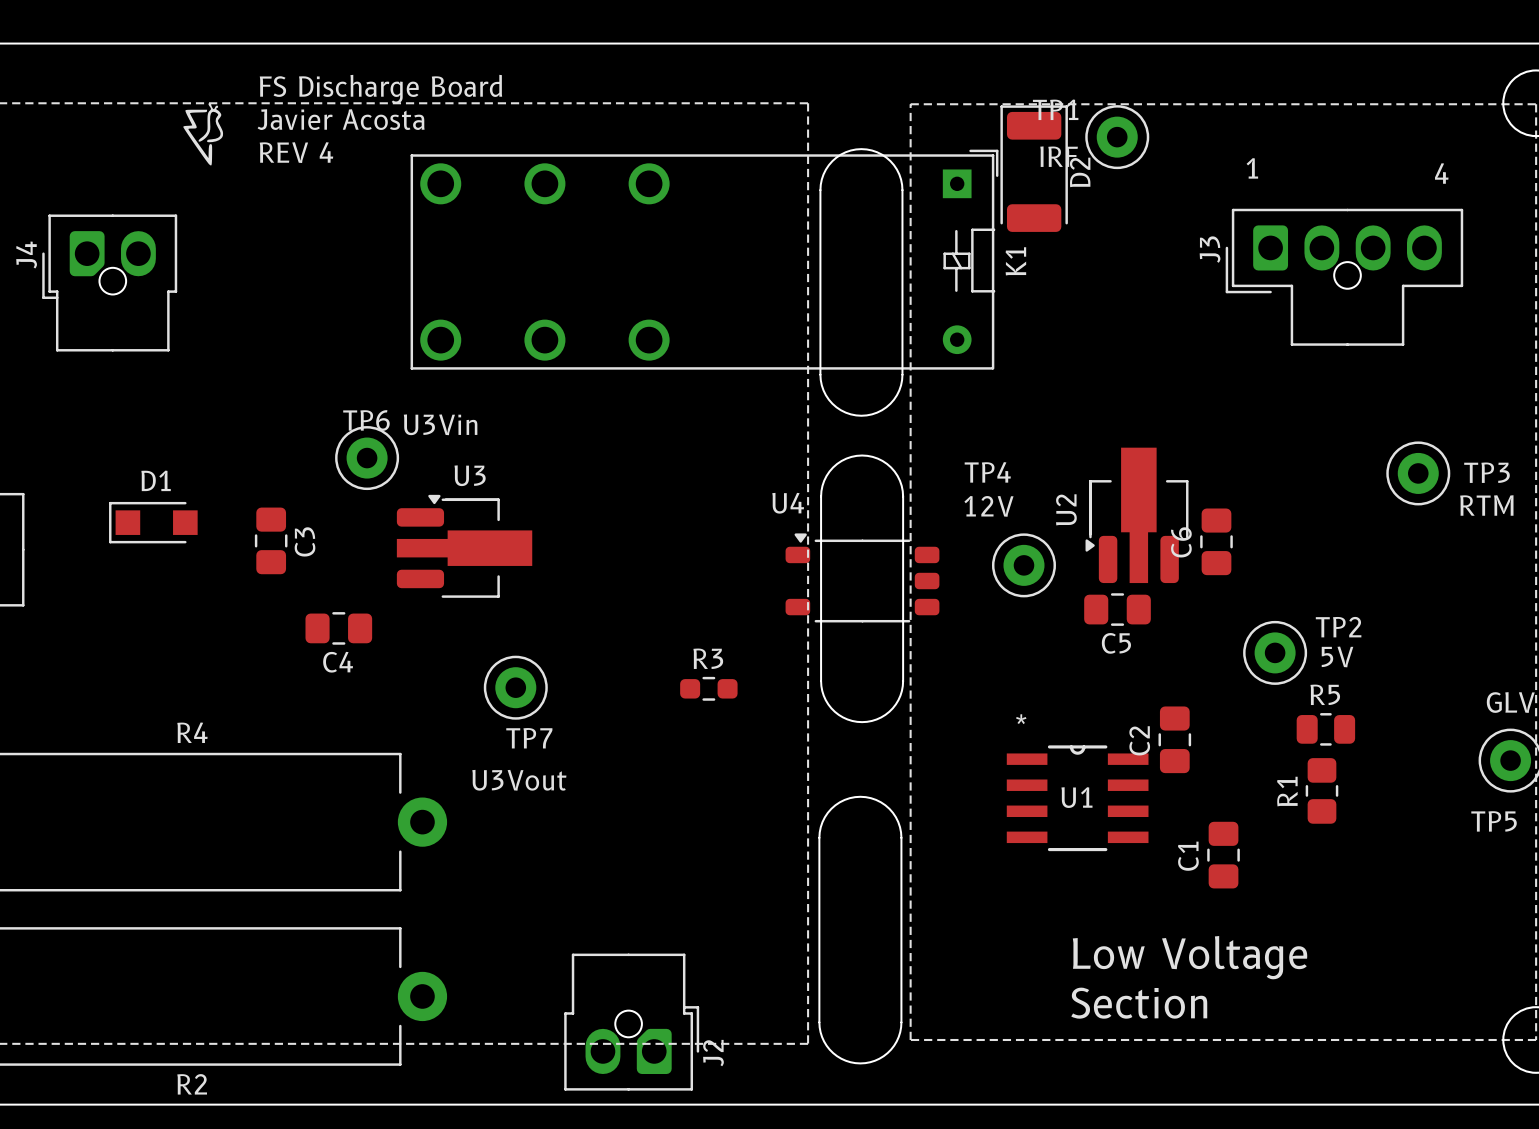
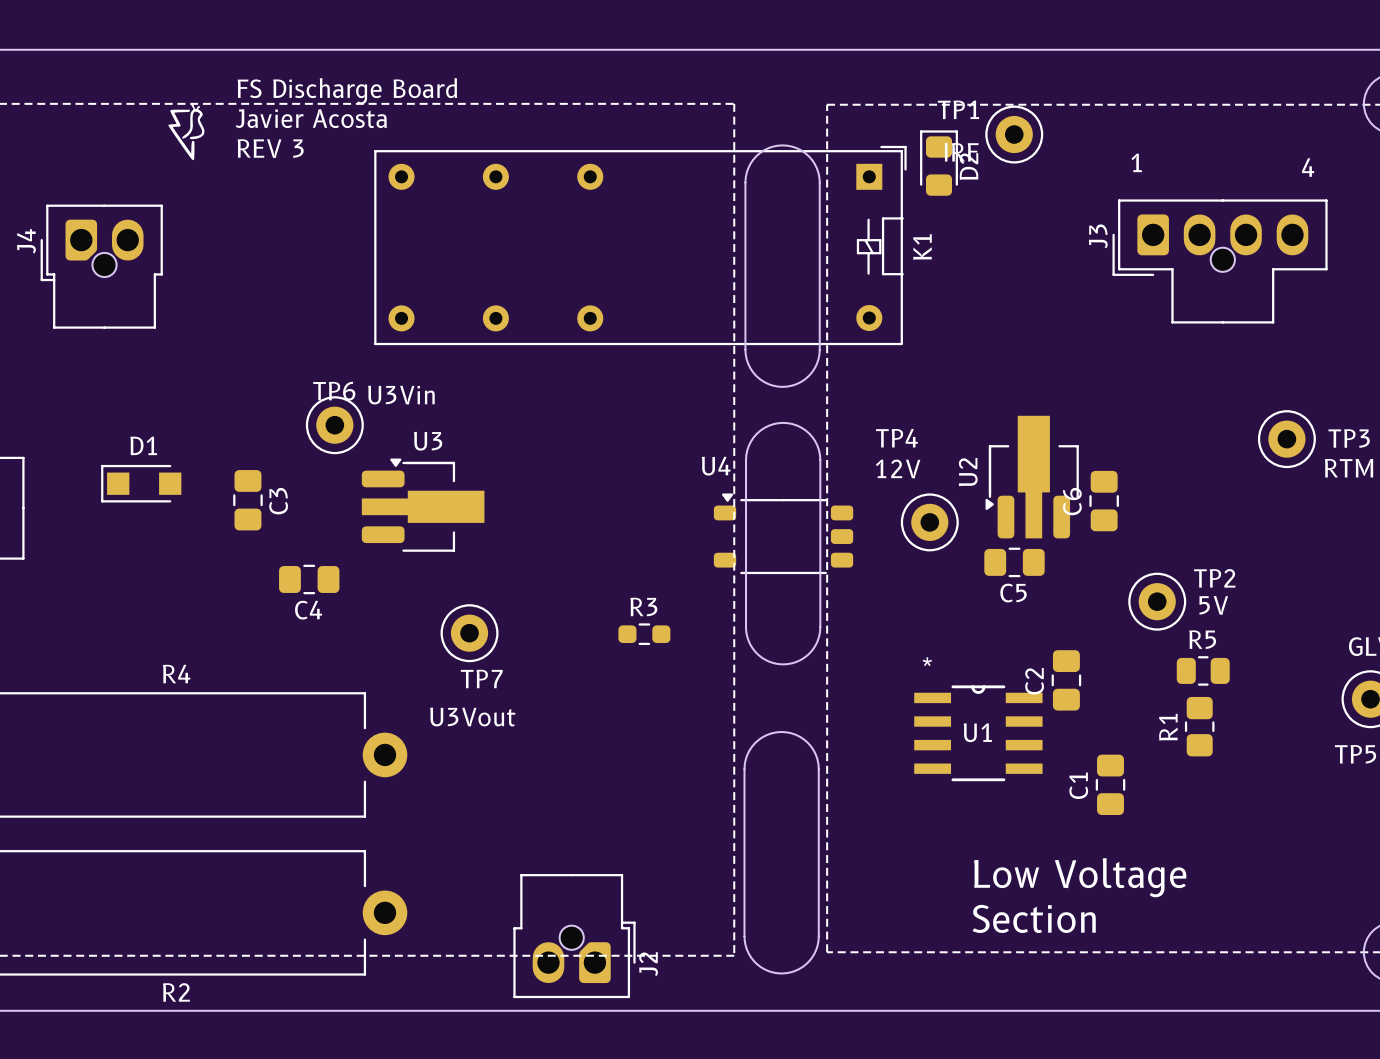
D2 footprint: [1000, 105, 1068, 232] -> [920, 130, 958, 196]
K1 footprint: [410, 149, 999, 370] -> [374, 145, 907, 346]
text: REV 4 (296, 152) -> REV 3 (270, 148)

